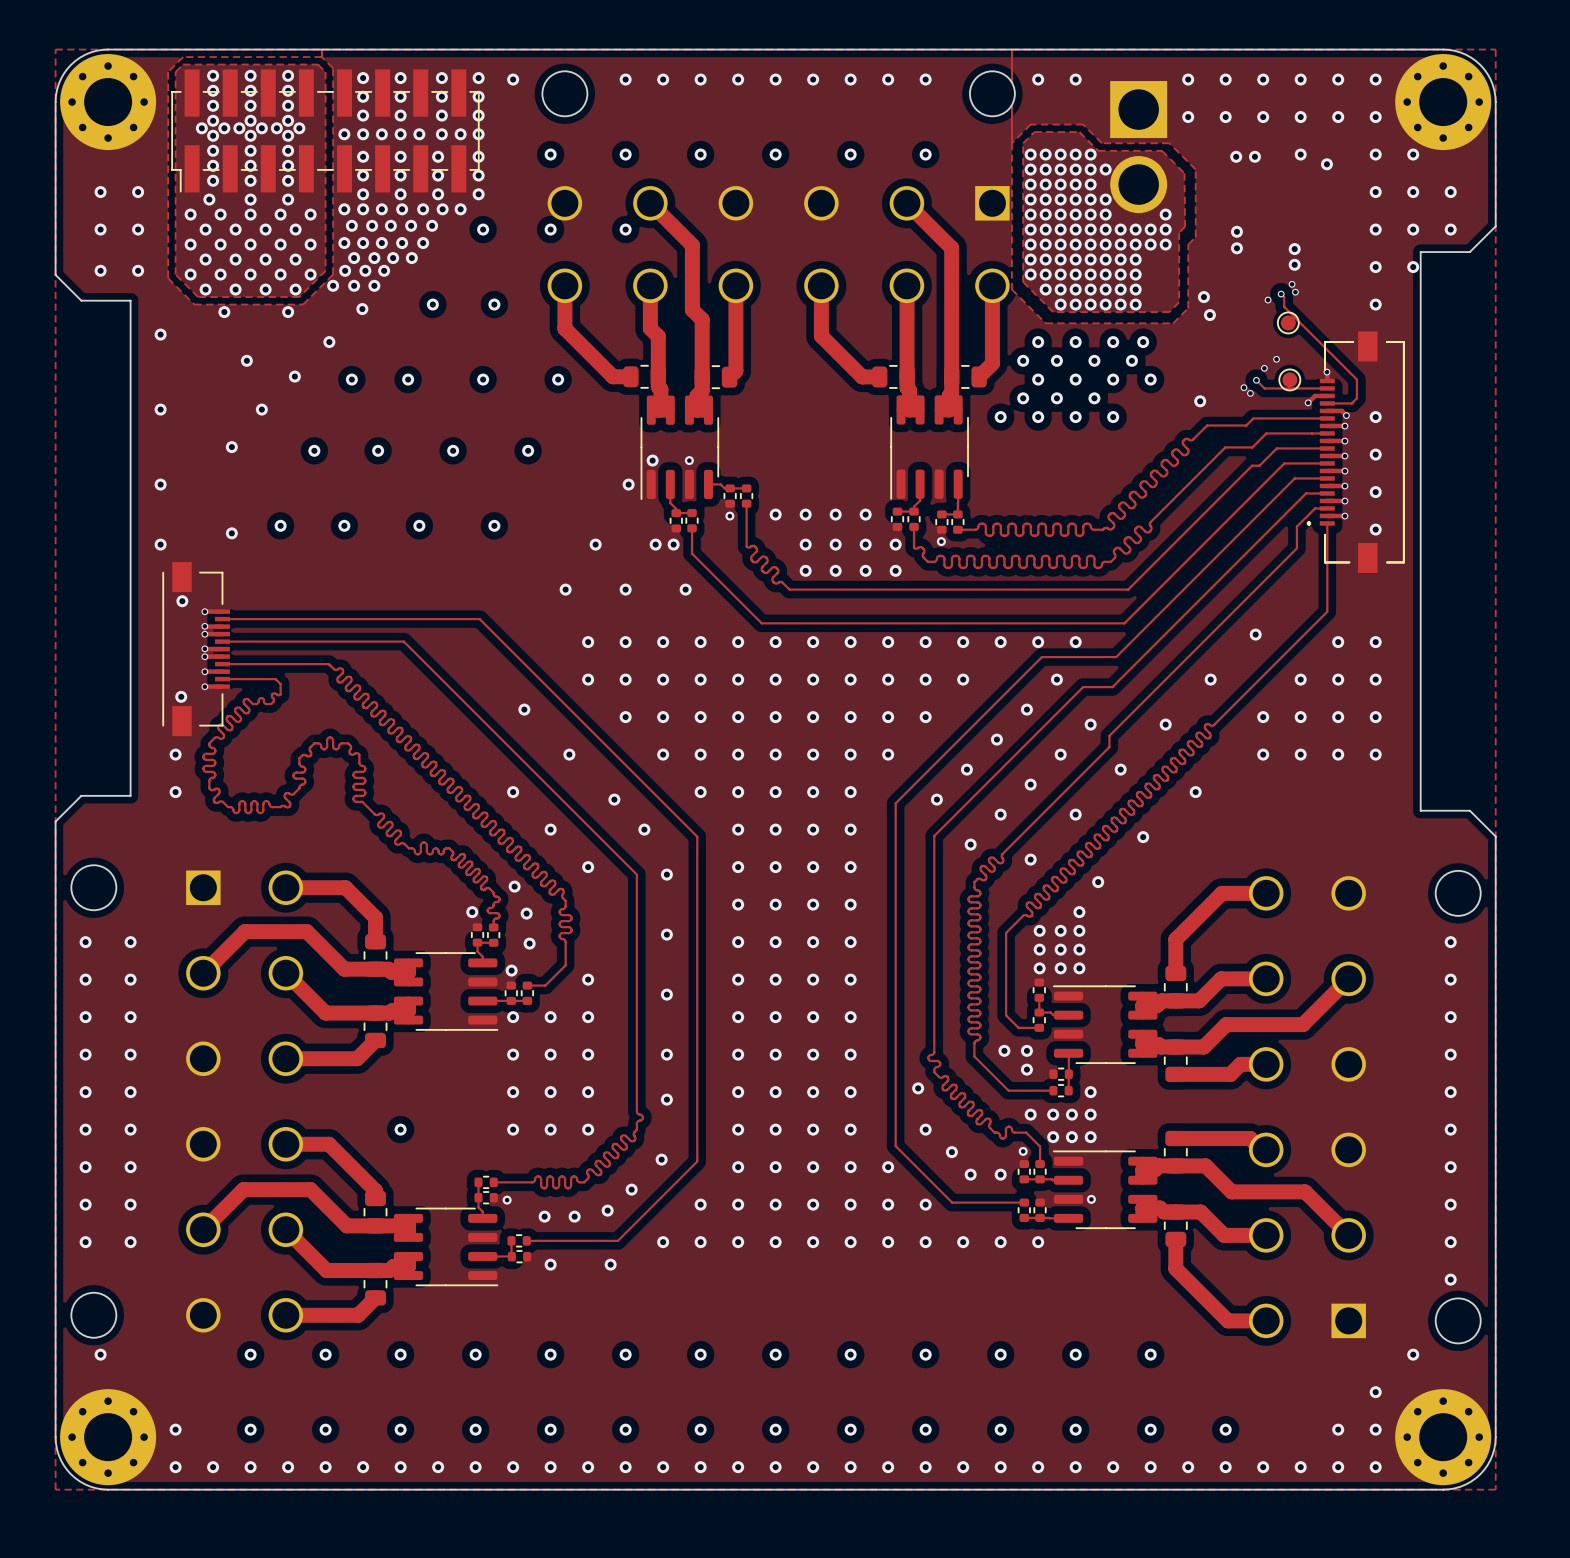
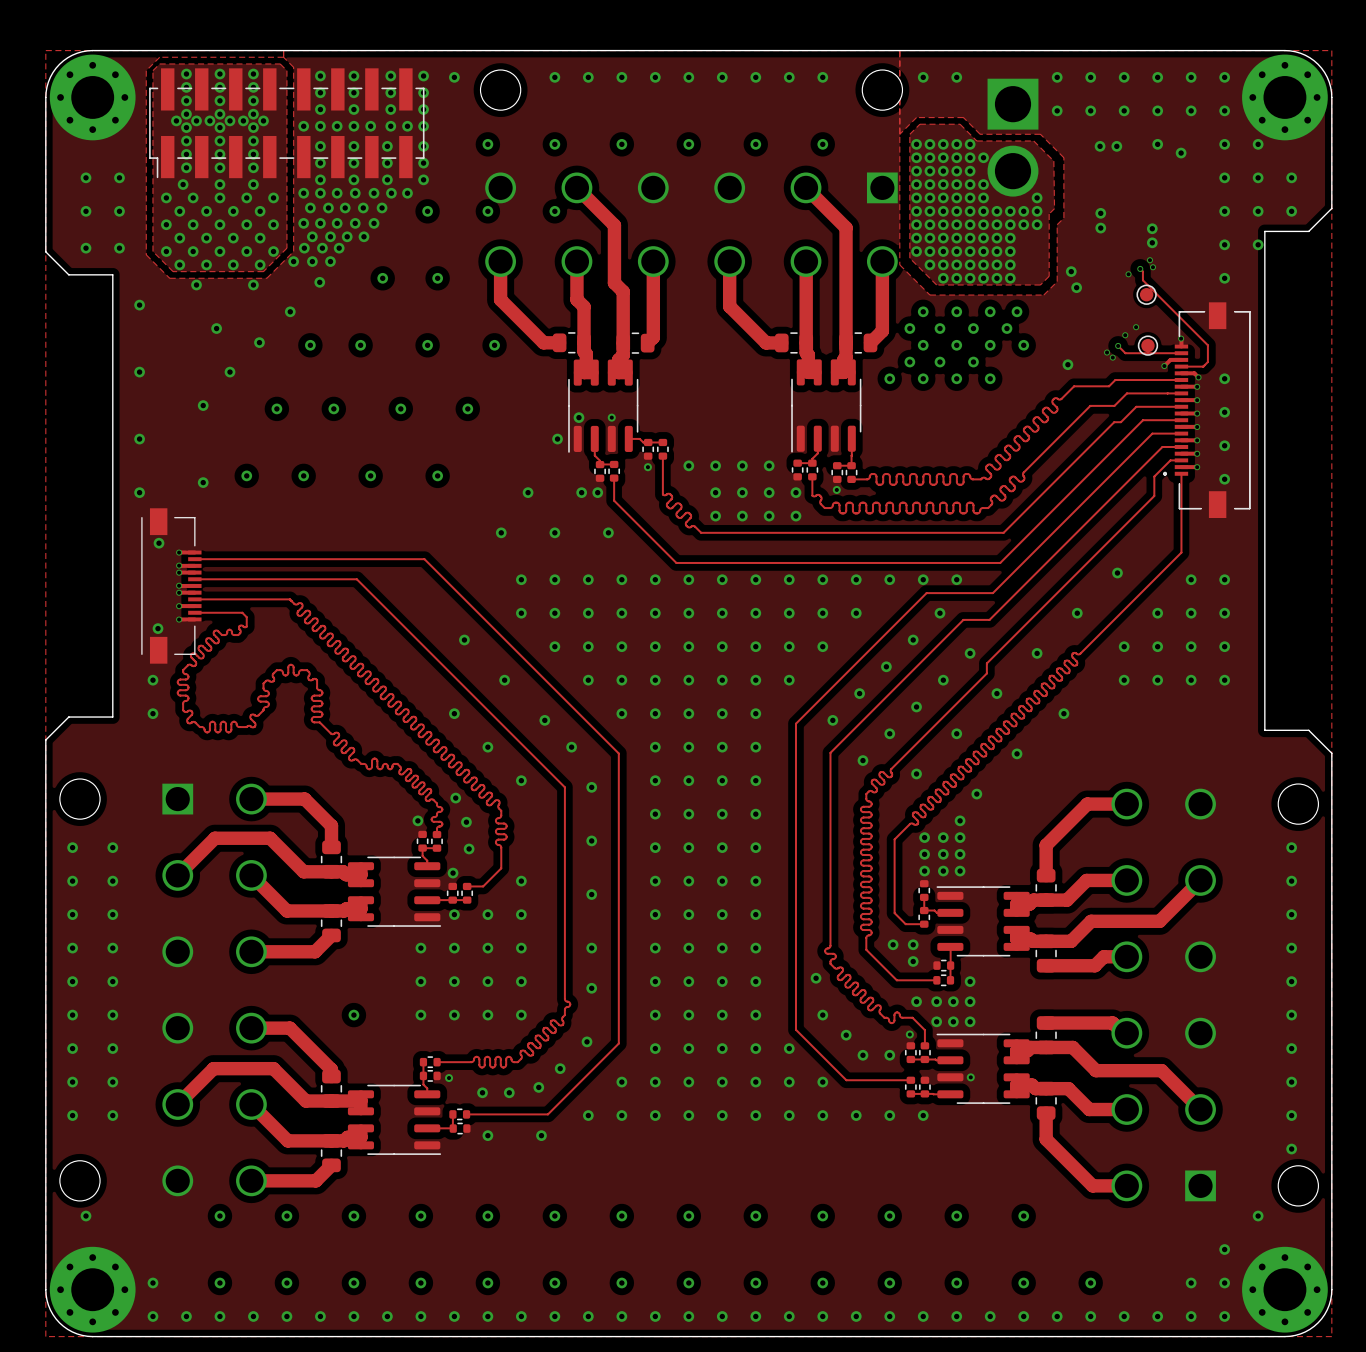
via: none -> (420, 948)
via: none -> (420, 981)
via: none -> (420, 1015)

